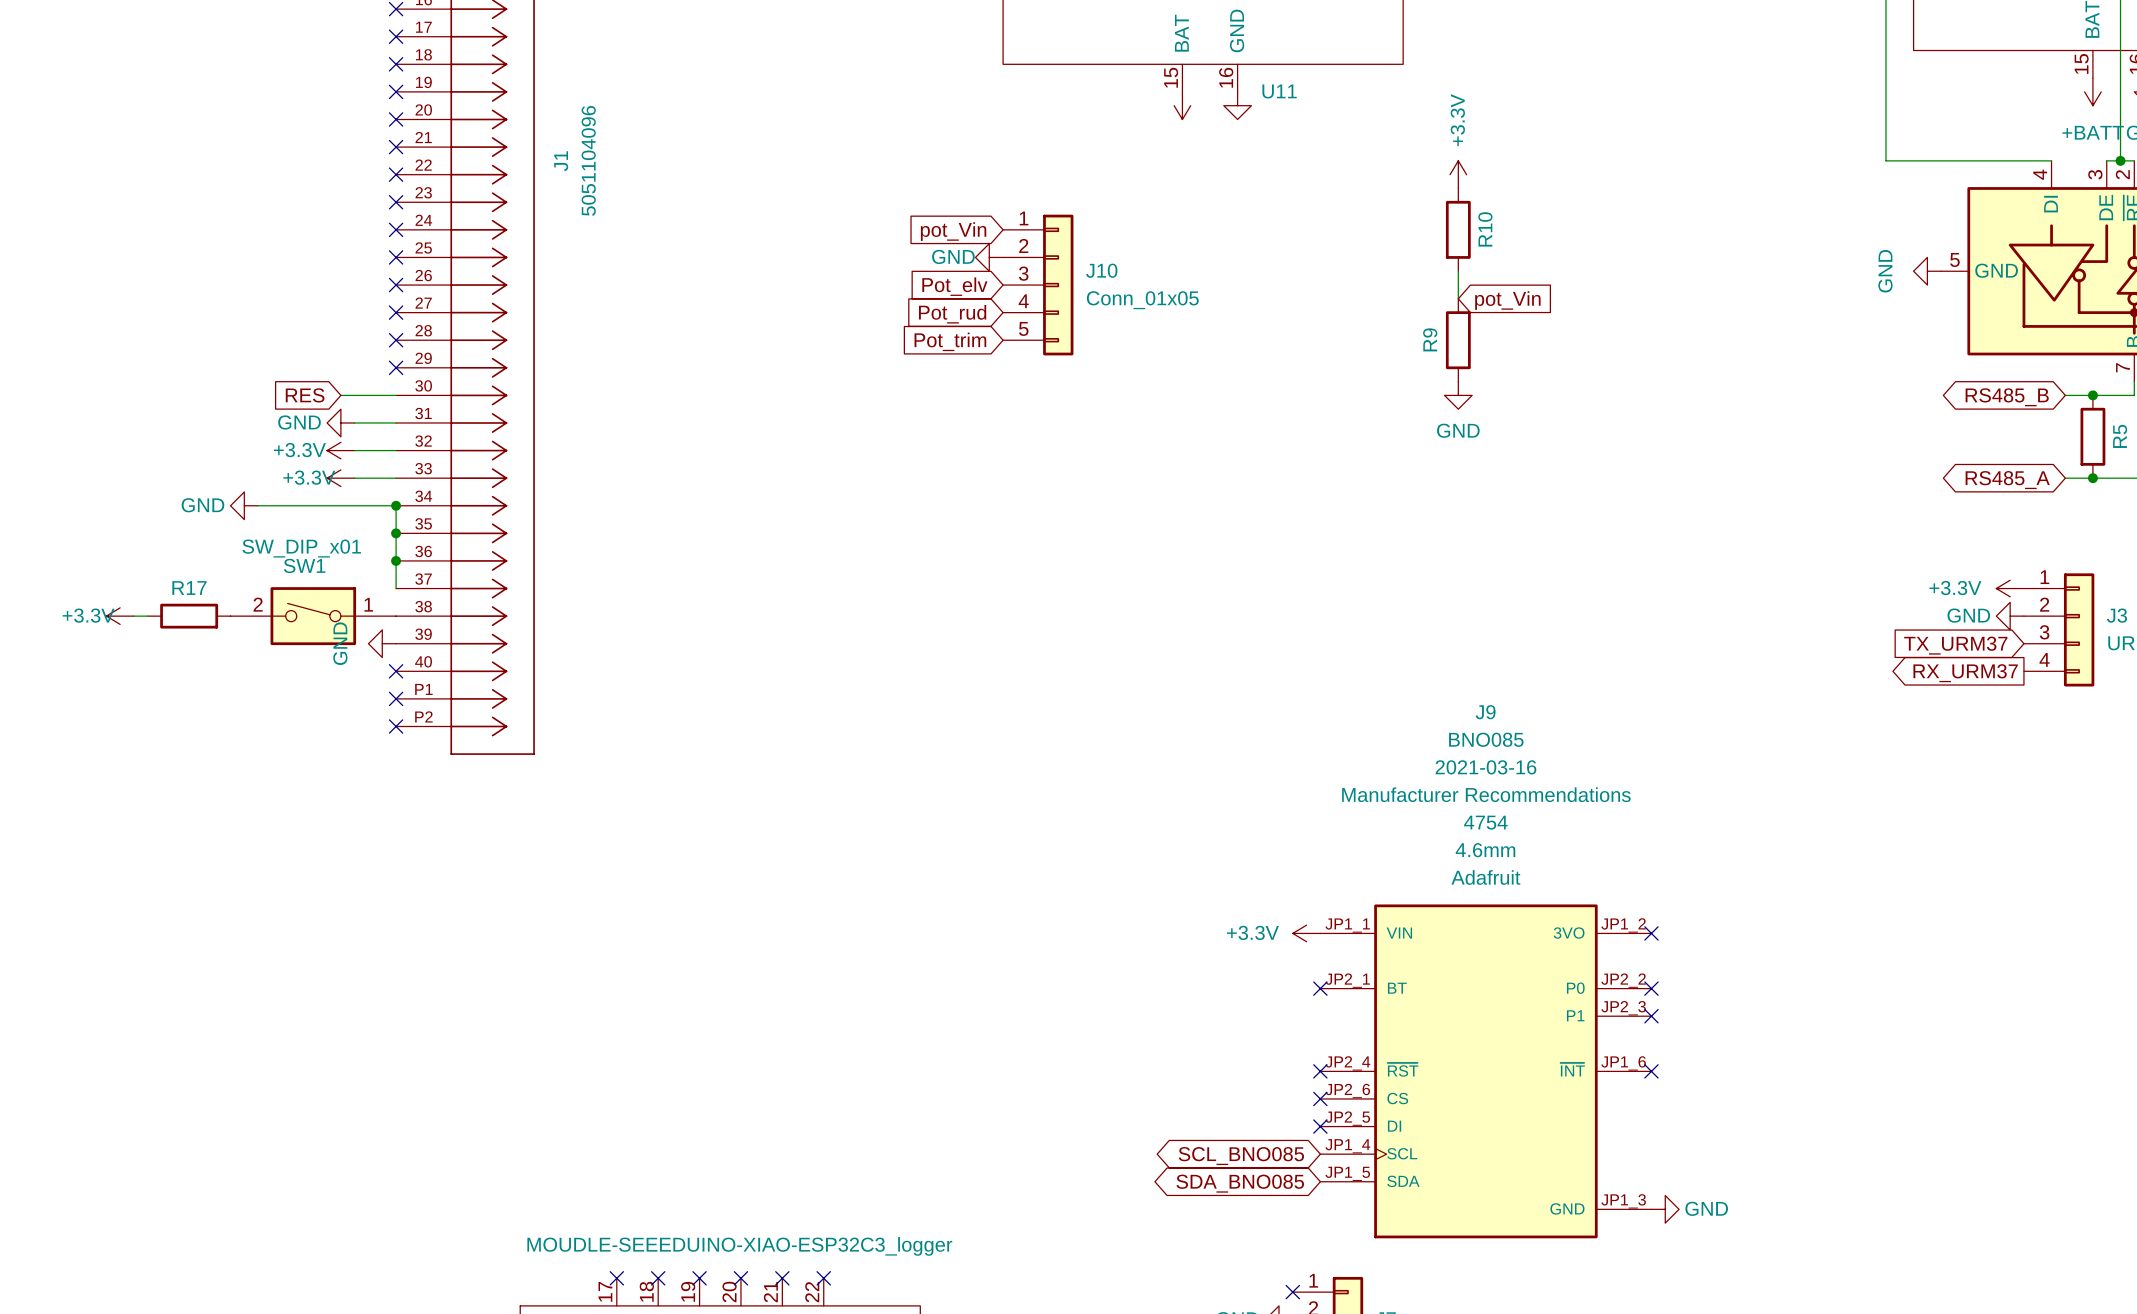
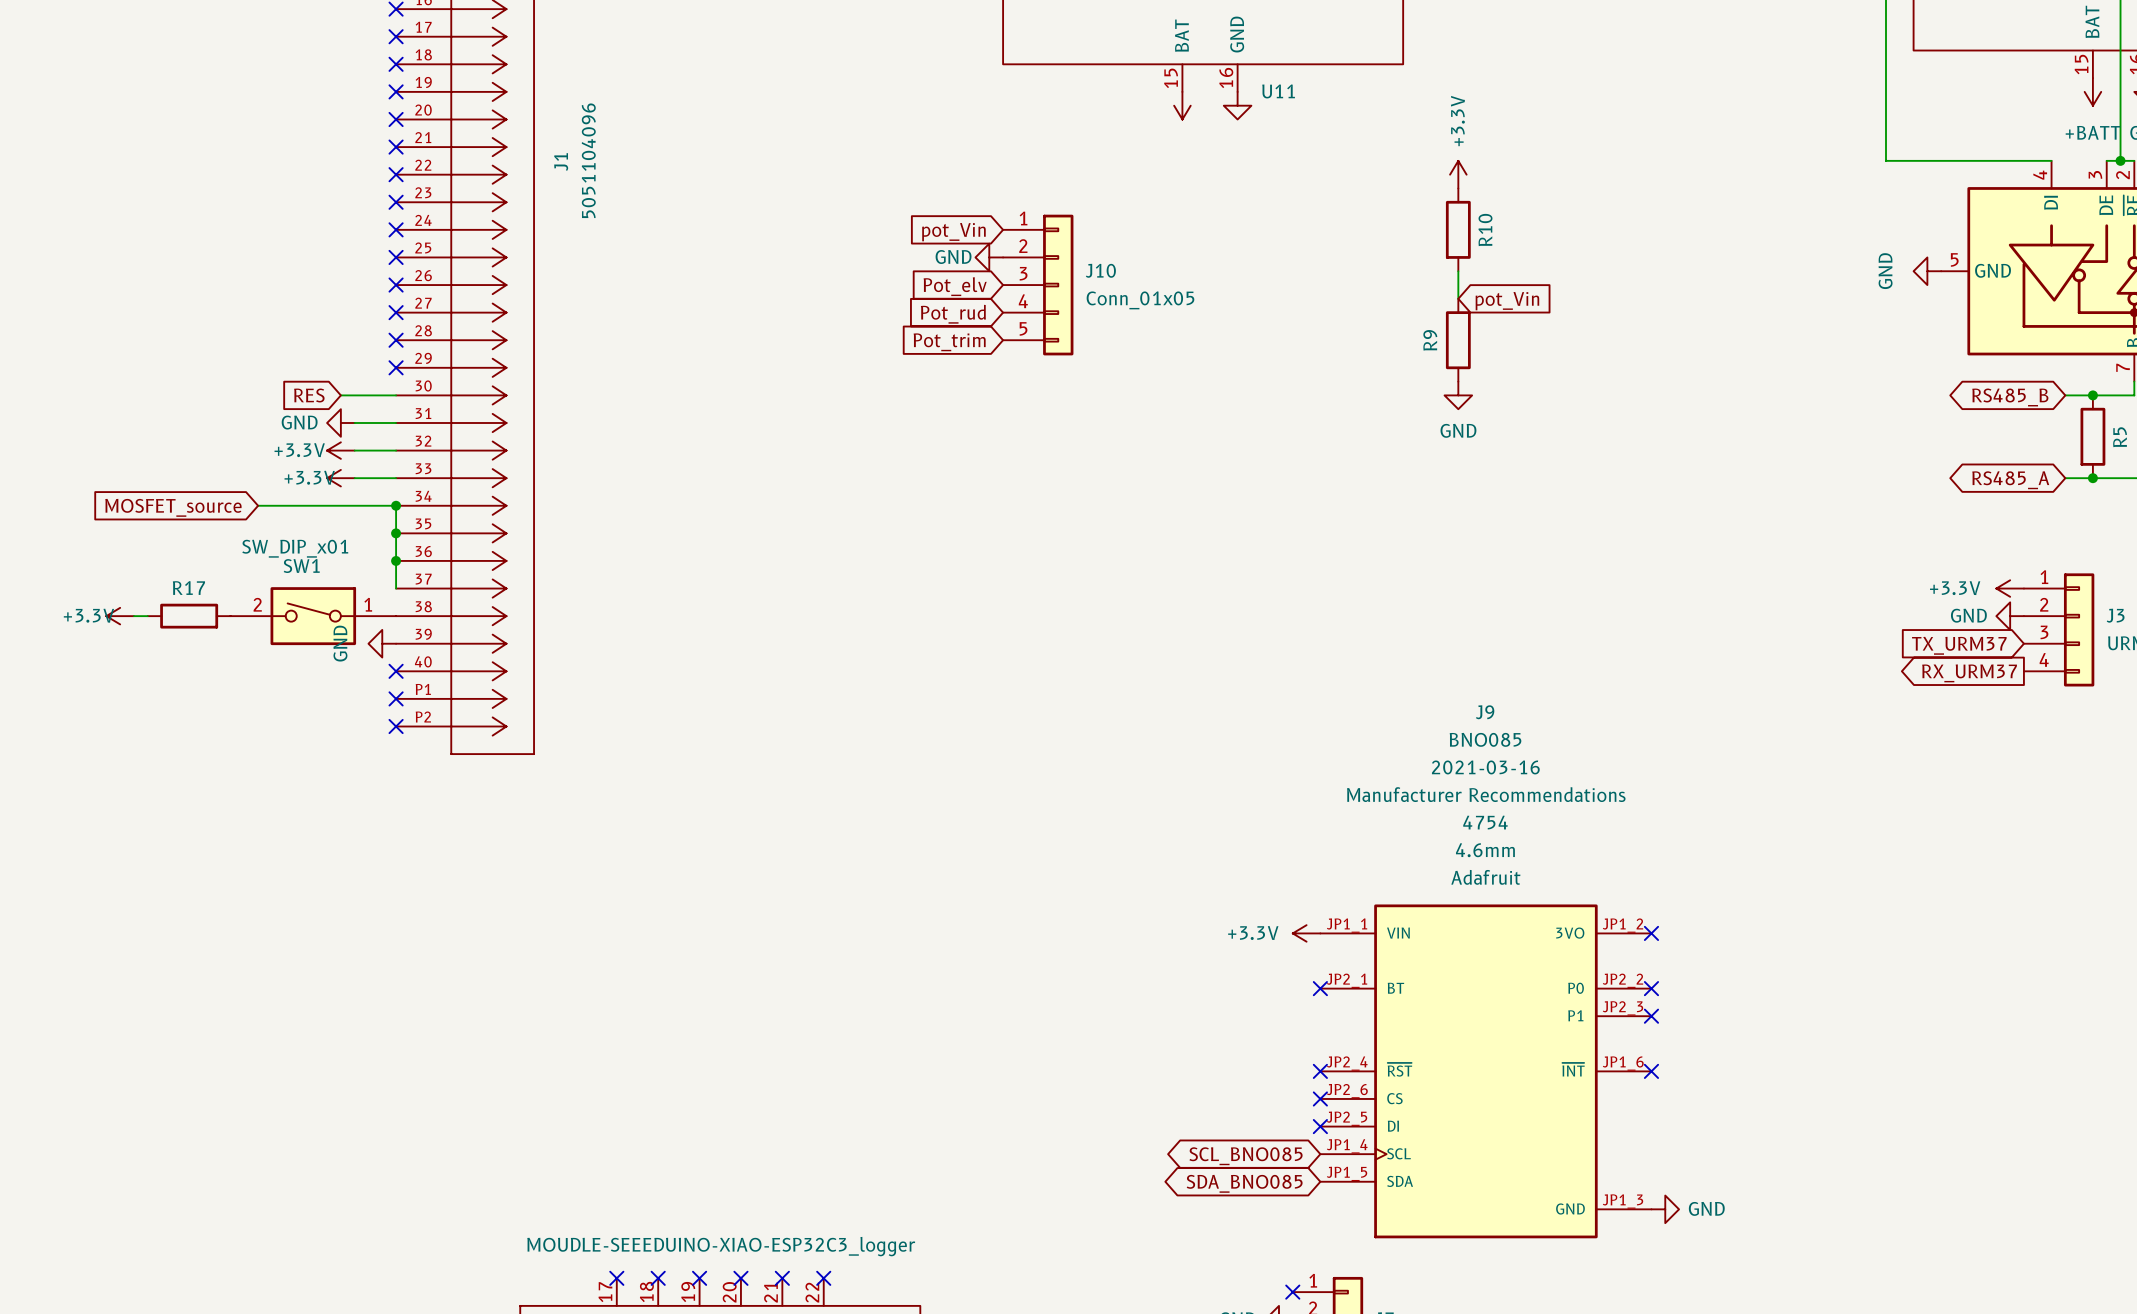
power symbol: GND (244, 505) -> none
global label: none -> MOSFET_source (173, 507)

